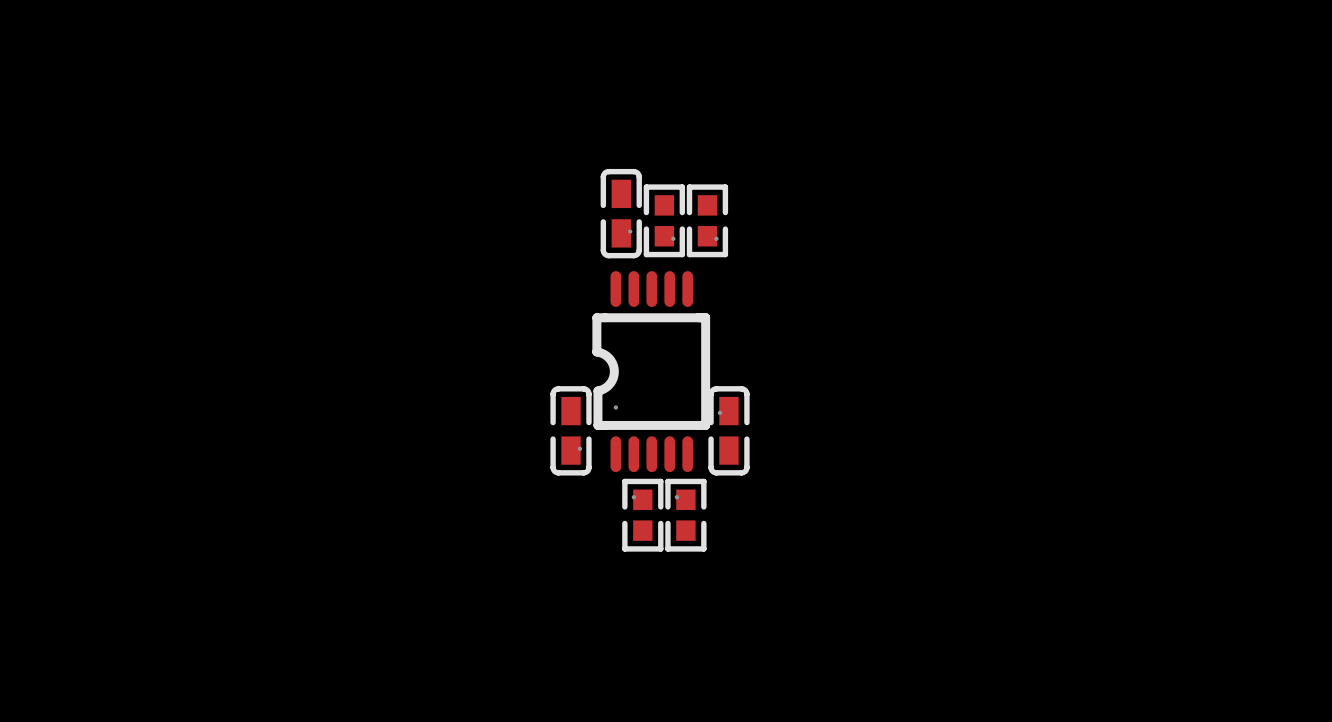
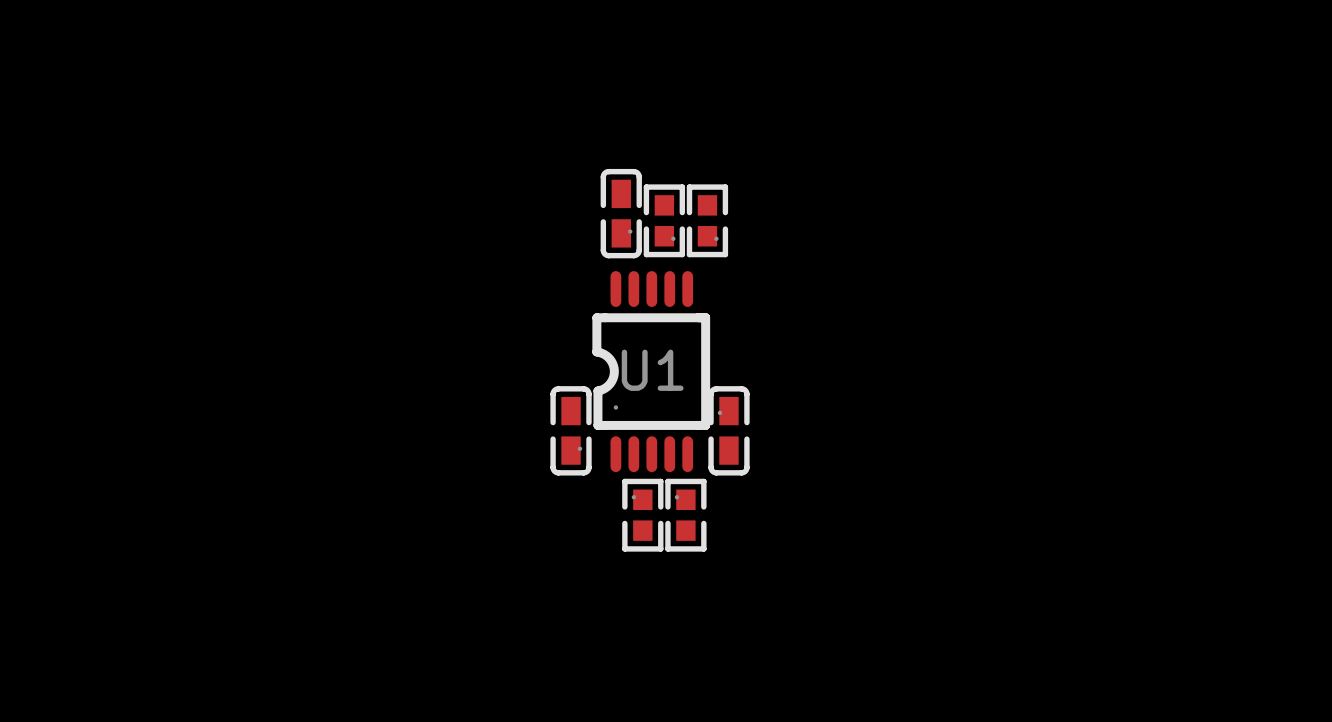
U1 name: none -> U1 (652, 370)

